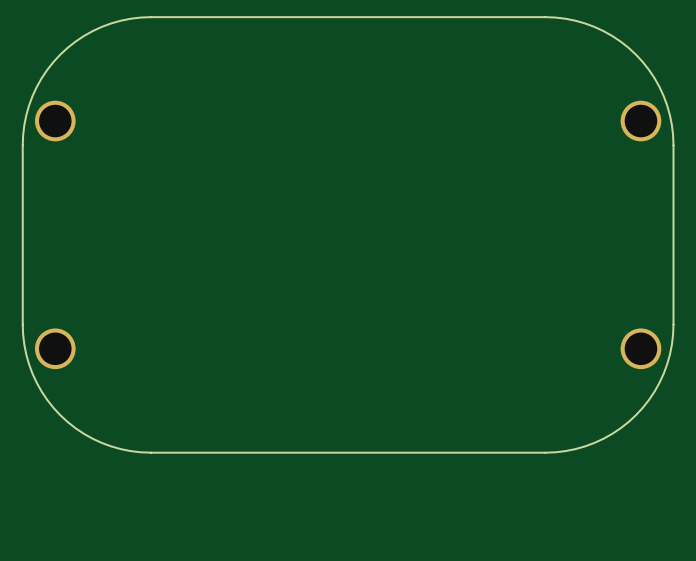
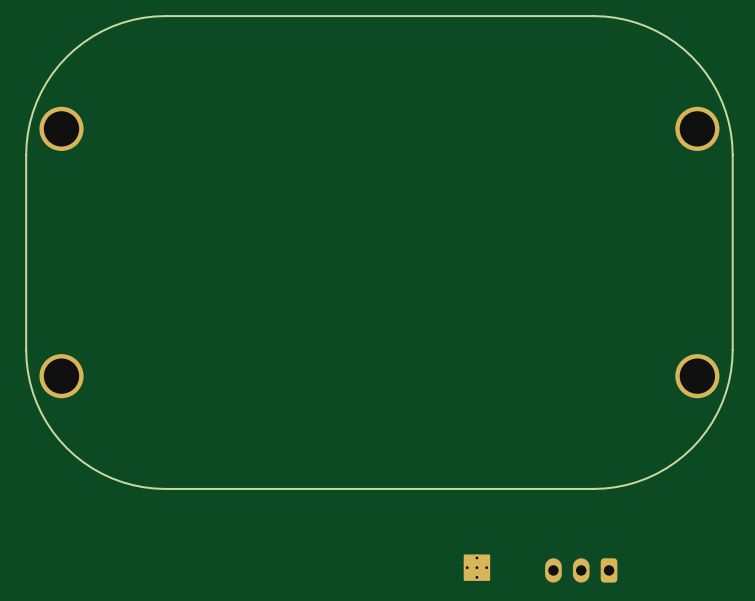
part: none -> (476, 567)
part: none -> (581, 570)

